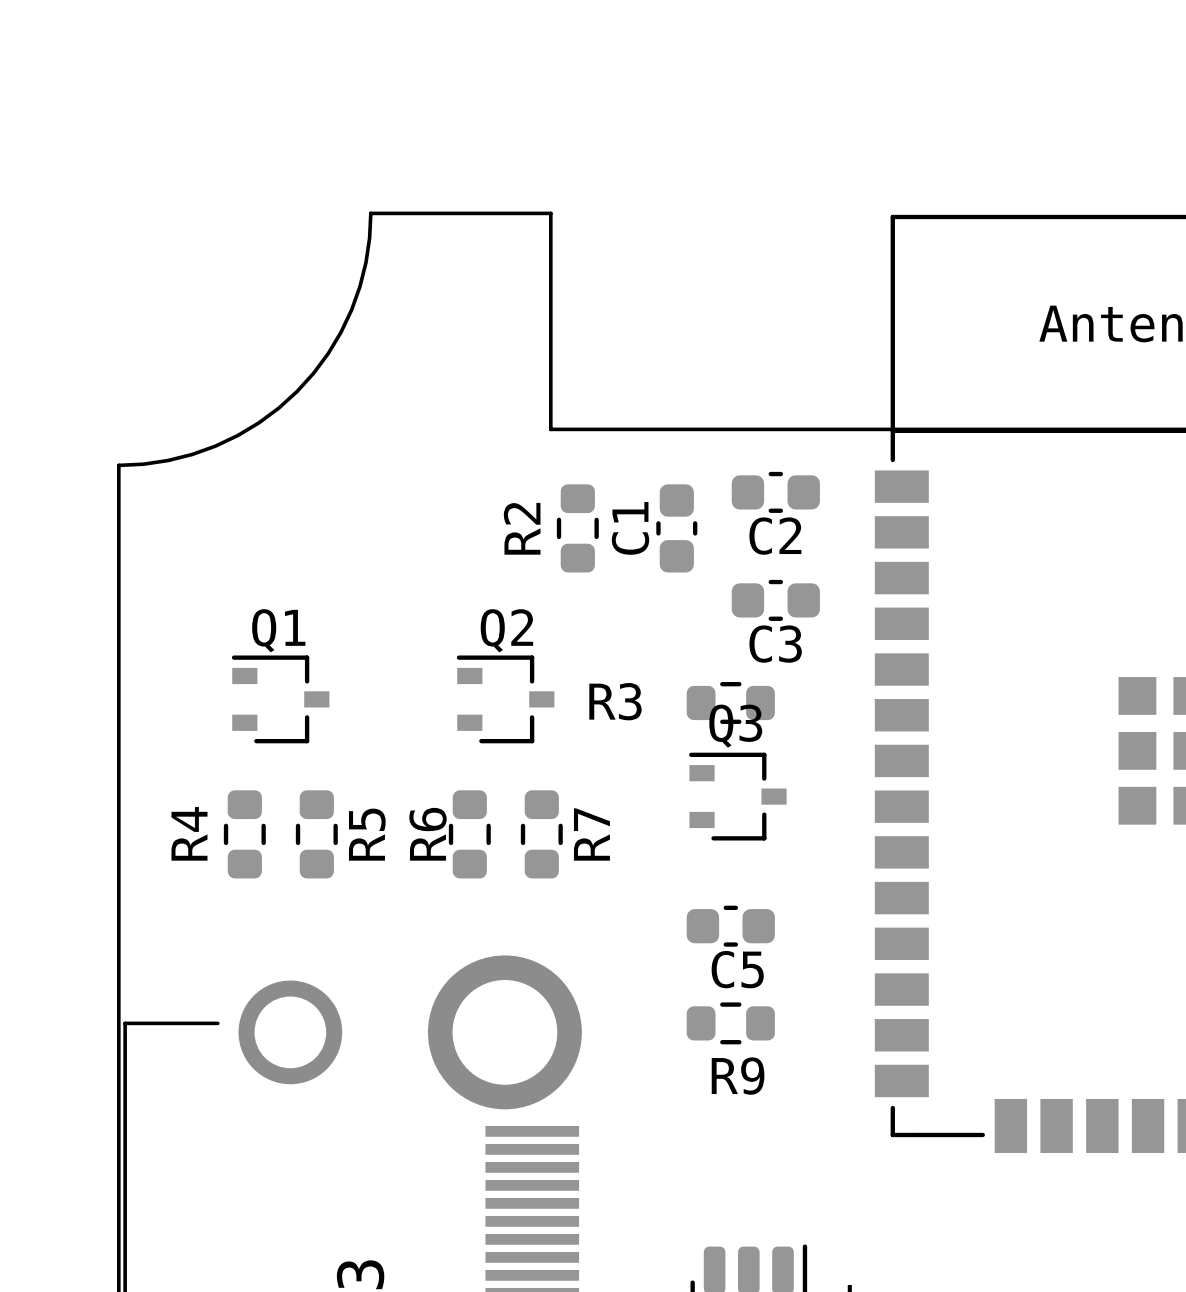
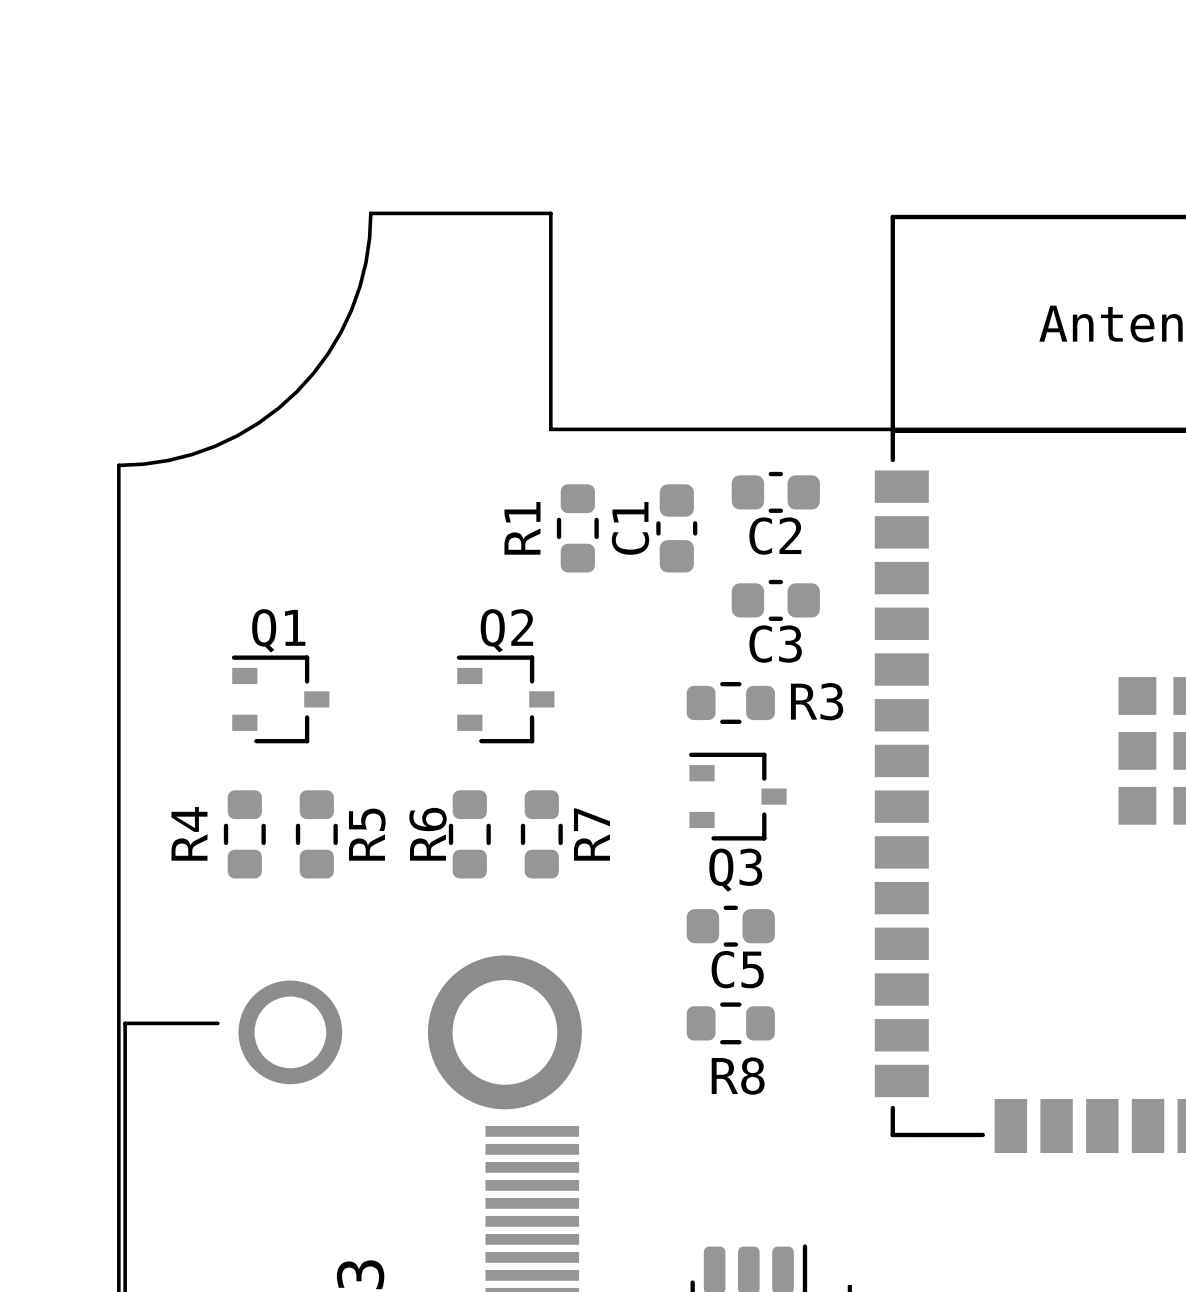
R2 name: R2 (522, 528) -> R1 (522, 528)
R3 name position: R3 (615, 701) -> R3 (817, 701)
Q3 name position: Q3 (735, 726) -> Q3 (735, 870)
R9 name: R9 (738, 1076) -> R8 (738, 1076)

